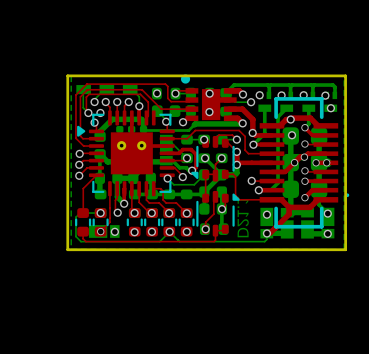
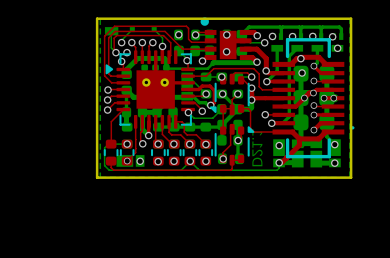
part footprint: [99, 84, 115, 94] -> [129, 27, 135, 33]
part footprint: [122, 85, 138, 95] -> [151, 27, 157, 33]

